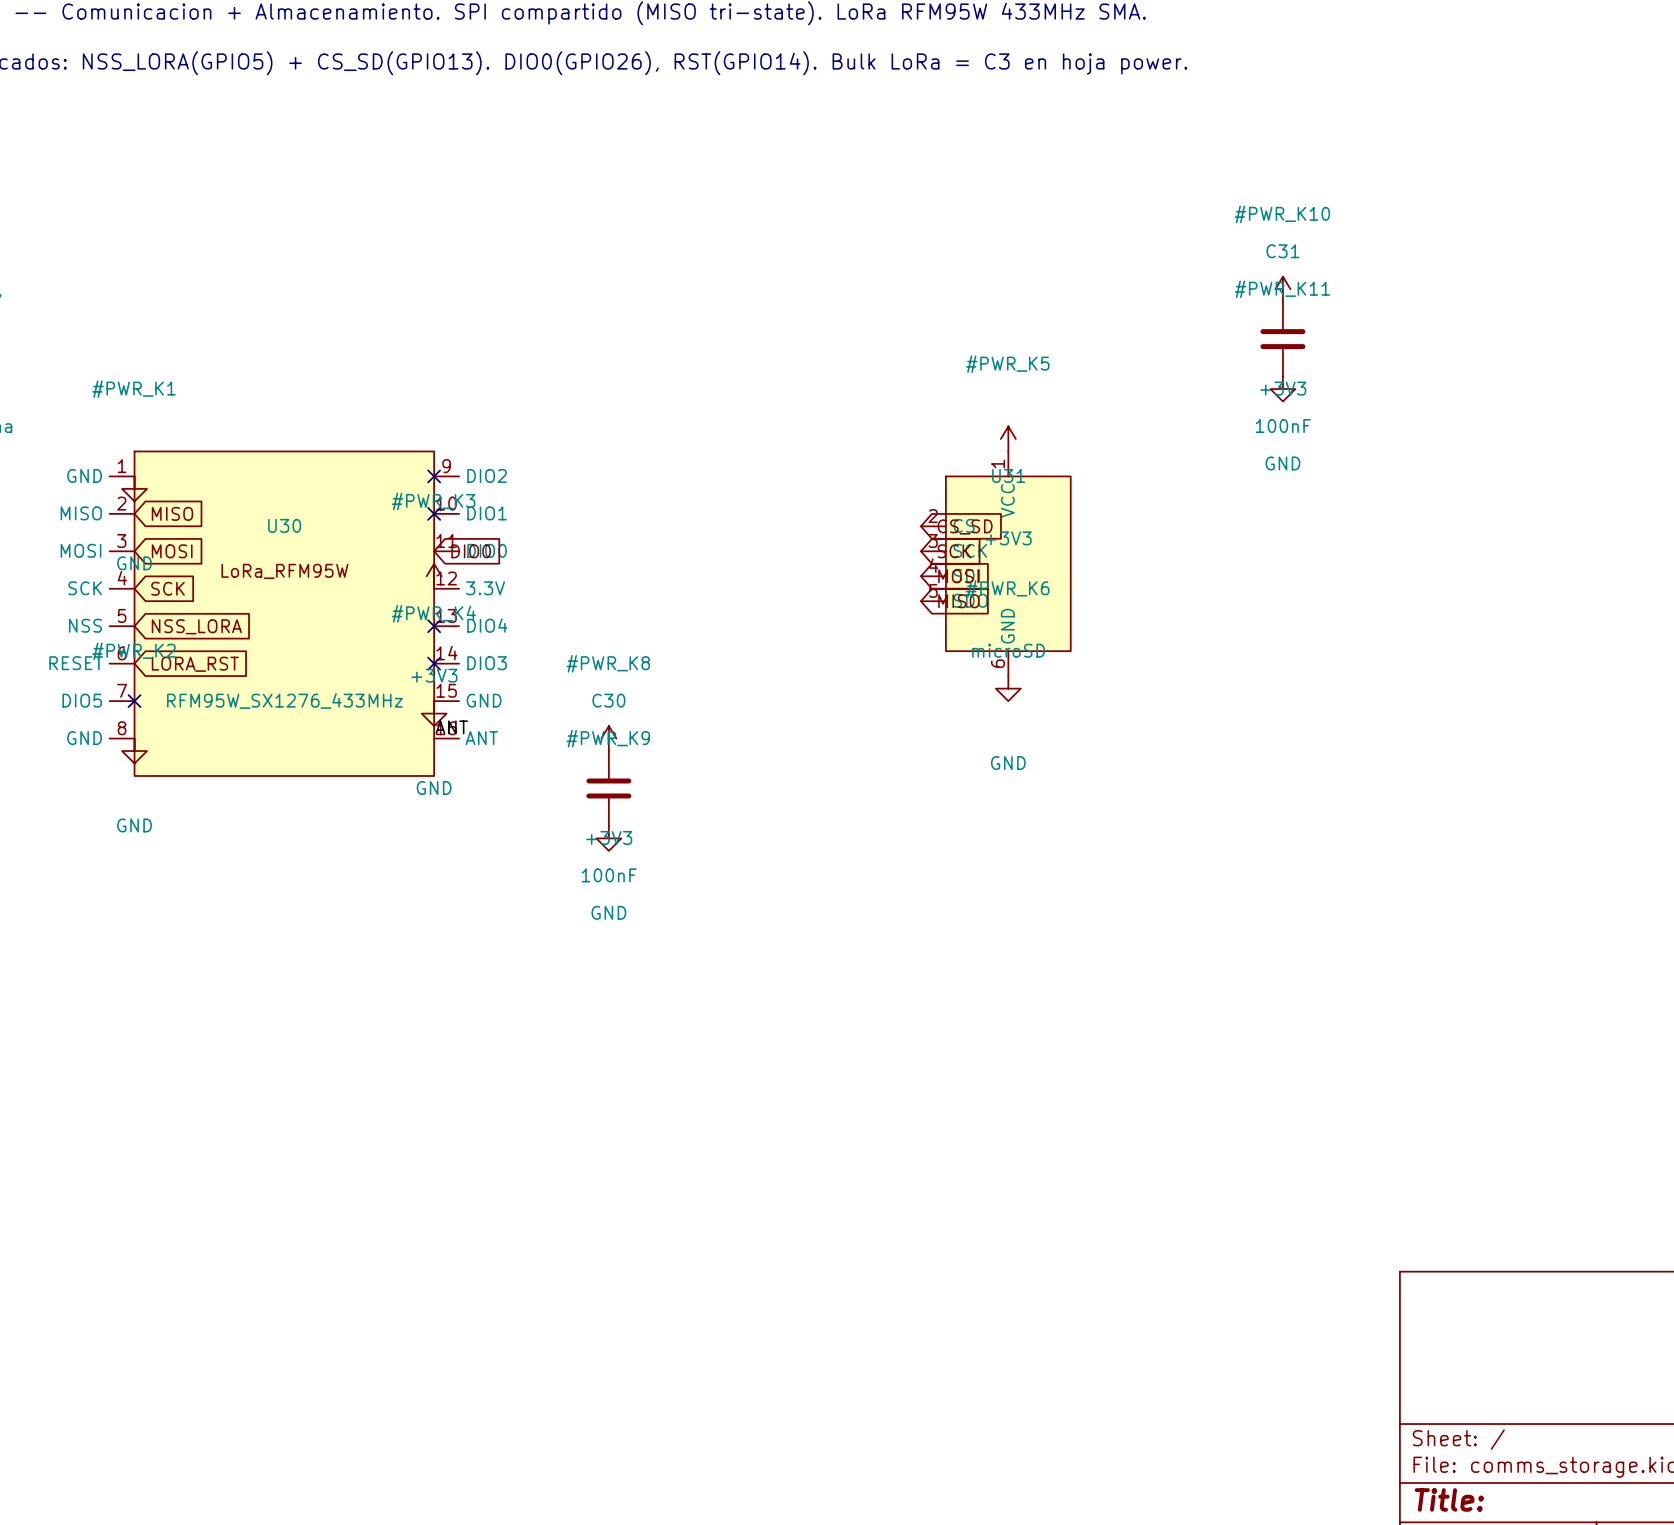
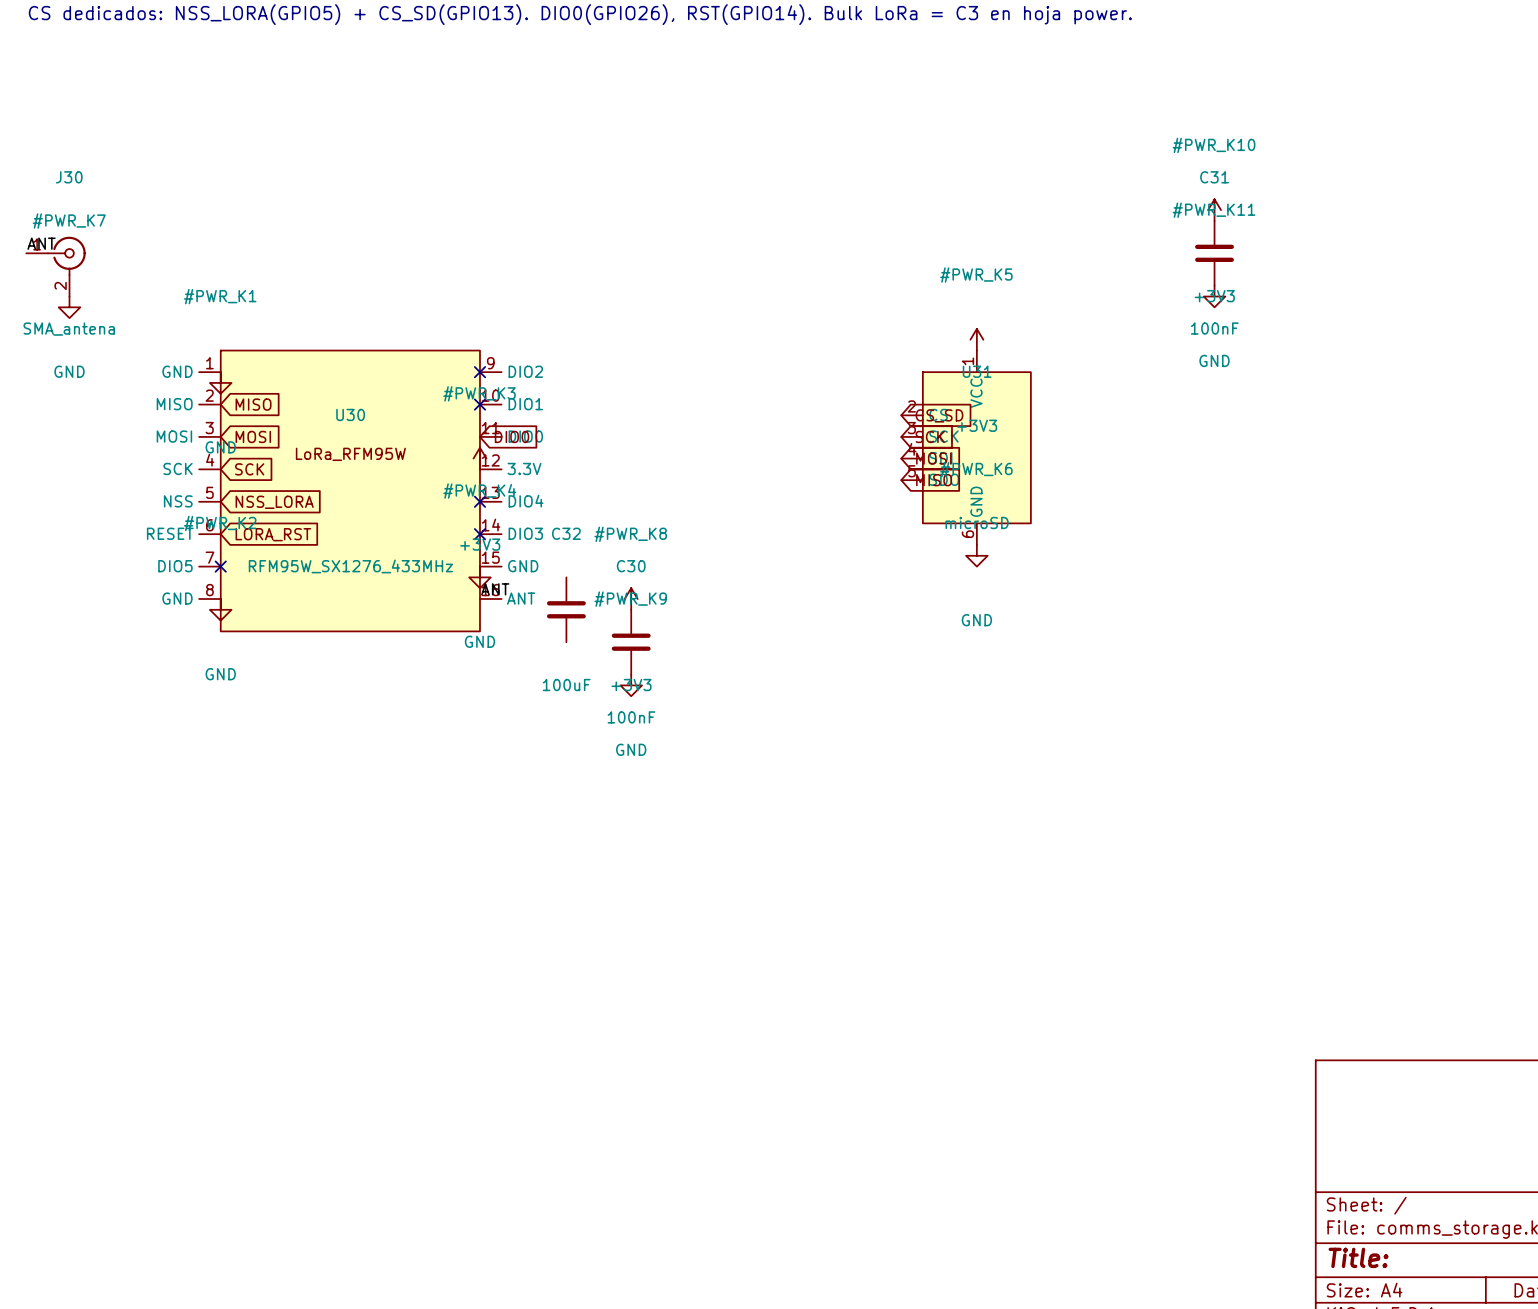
C32: none -> 100uF (566, 609)

